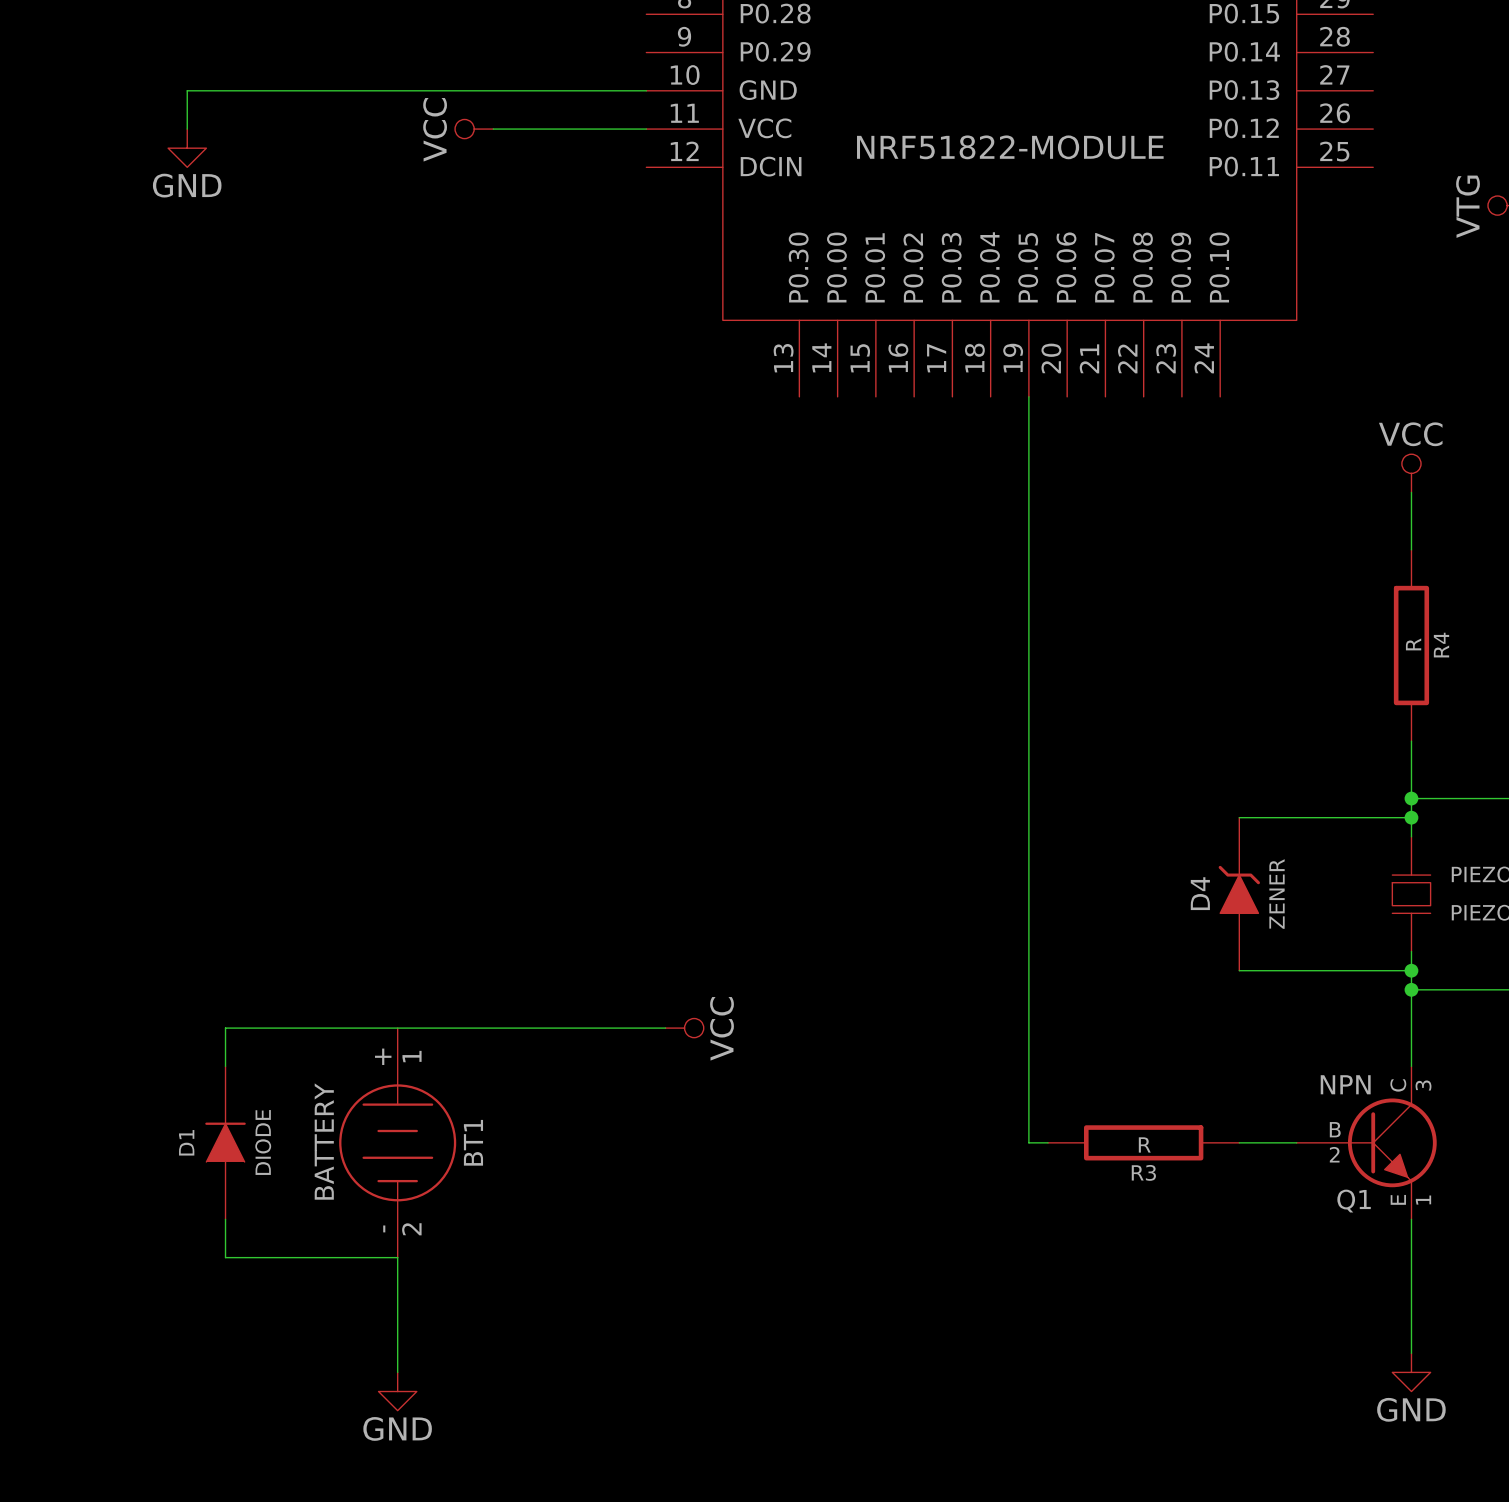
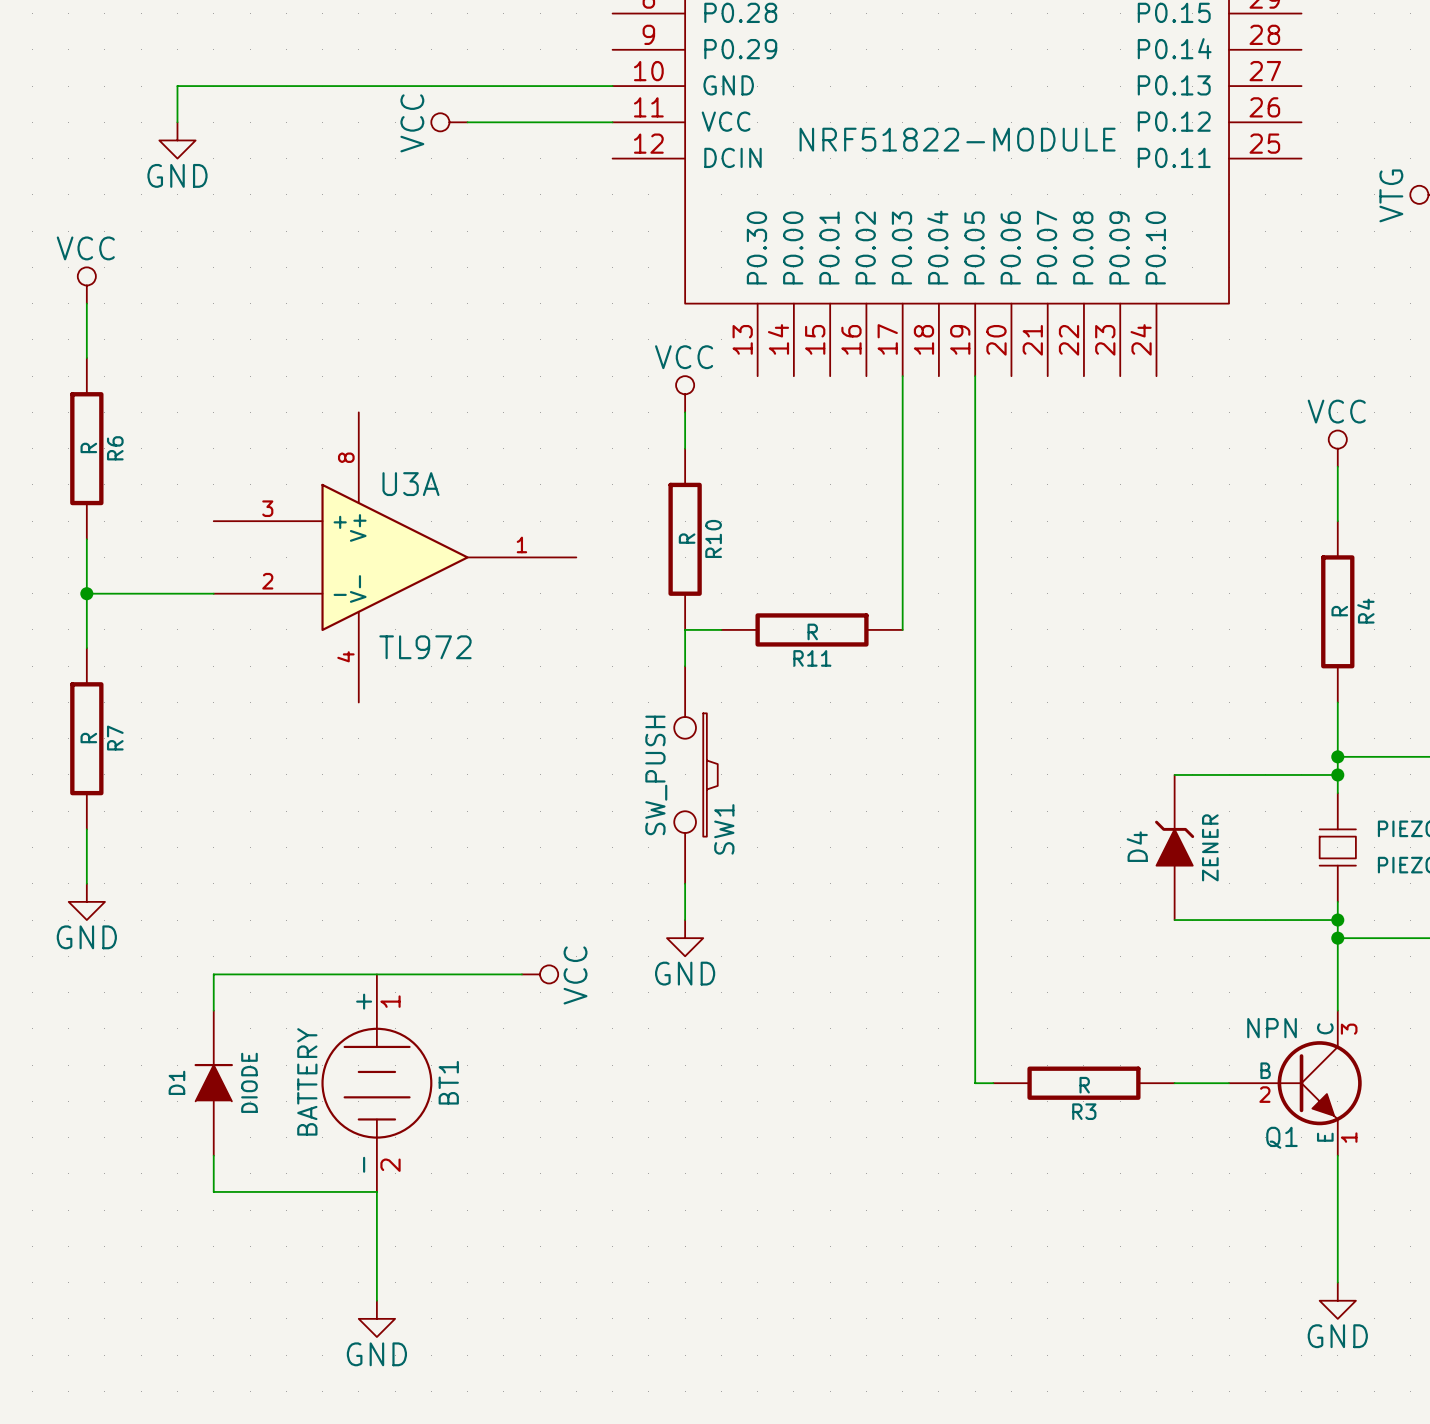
power symbol: none -> VCC (86, 285)
wire: none -> (86, 303) (86, 358)
wire: none -> (902, 376) (902, 629)
power symbol: none -> VCC (685, 394)
wire: none -> (685, 412) (685, 448)
R6: none -> R (86, 448)
wire: none -> (86, 539) (86, 648)
R10: none -> R (685, 539)
U3A: none -> TL972 (395, 557)
wire: none -> (86, 593) (213, 593)
junction: none -> (86, 593)
wire: none -> (721, 629) (685, 629) (685, 666)
R11: none -> R (812, 629)
R7: none -> R (86, 738)
SW1: none -> SW_PUSH (695, 774)
wire: none -> (86, 829) (86, 883)
wire: none -> (685, 883) (685, 920)
power symbol: none -> GND (86, 901)
power symbol: none -> GND (685, 938)
wire: (550, 1028) (665, 1028) -> none
power symbol position: VCC (684, 1028) -> VCC (540, 974)

